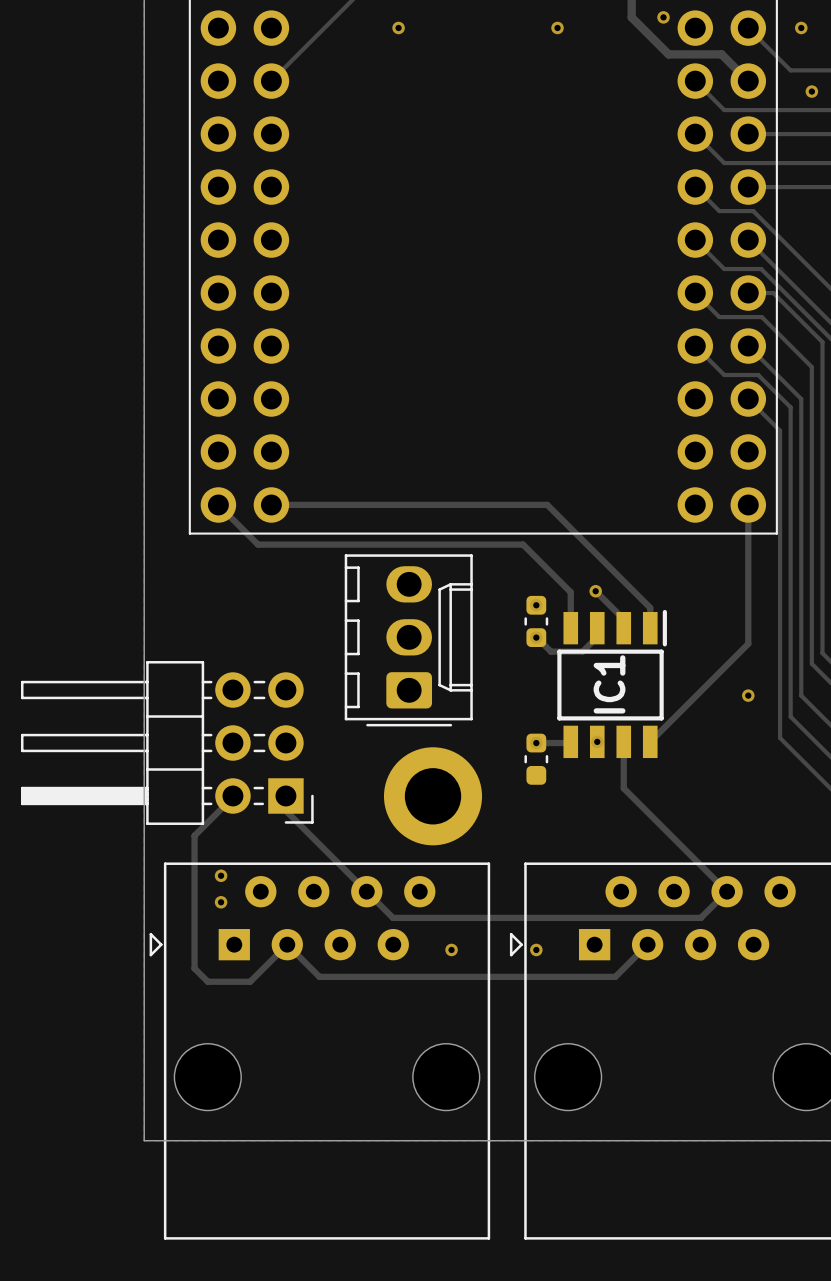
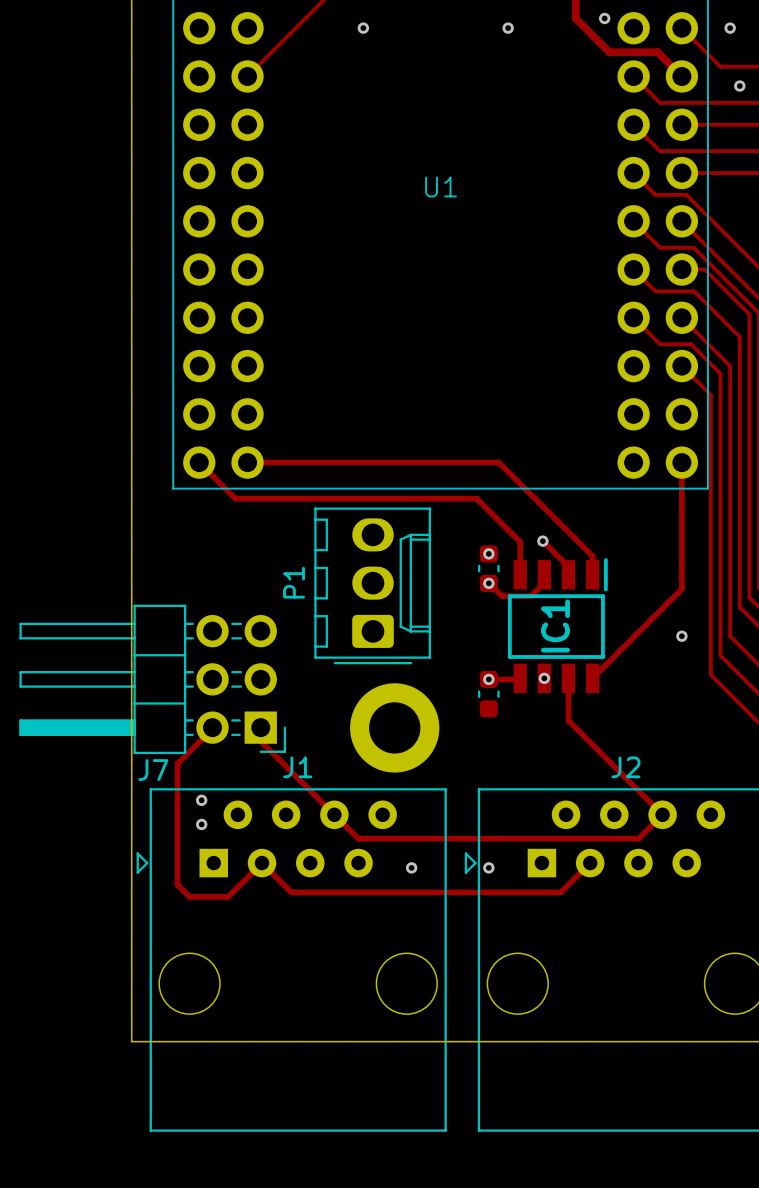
U1 name: none -> U1 (441, 186)
P1 name: none -> P1 (294, 582)
J1 name: none -> J1 (297, 767)
J2 name: none -> J2 (625, 767)
J7 name: none -> J7 (153, 770)

